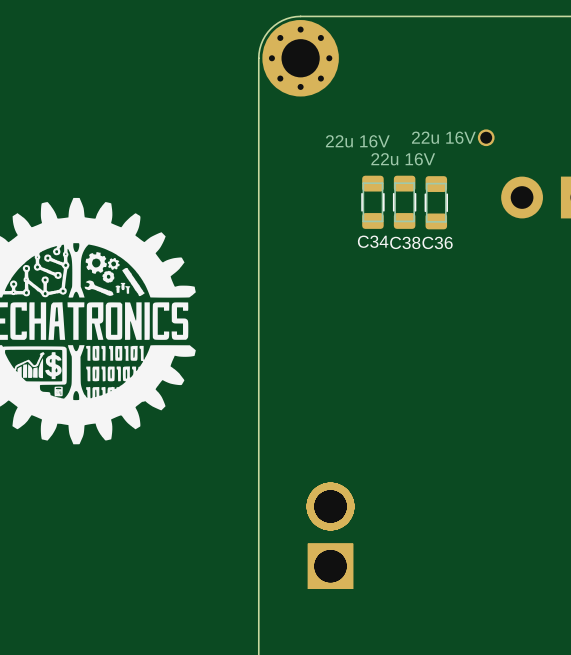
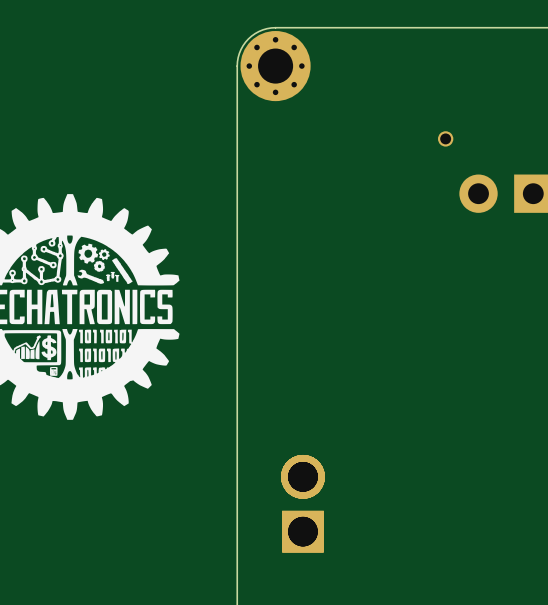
C34: 22u 16V (372, 202) -> none
C38: 22u 16V (404, 202) -> none
C36: 22u 16V (436, 202) -> none

